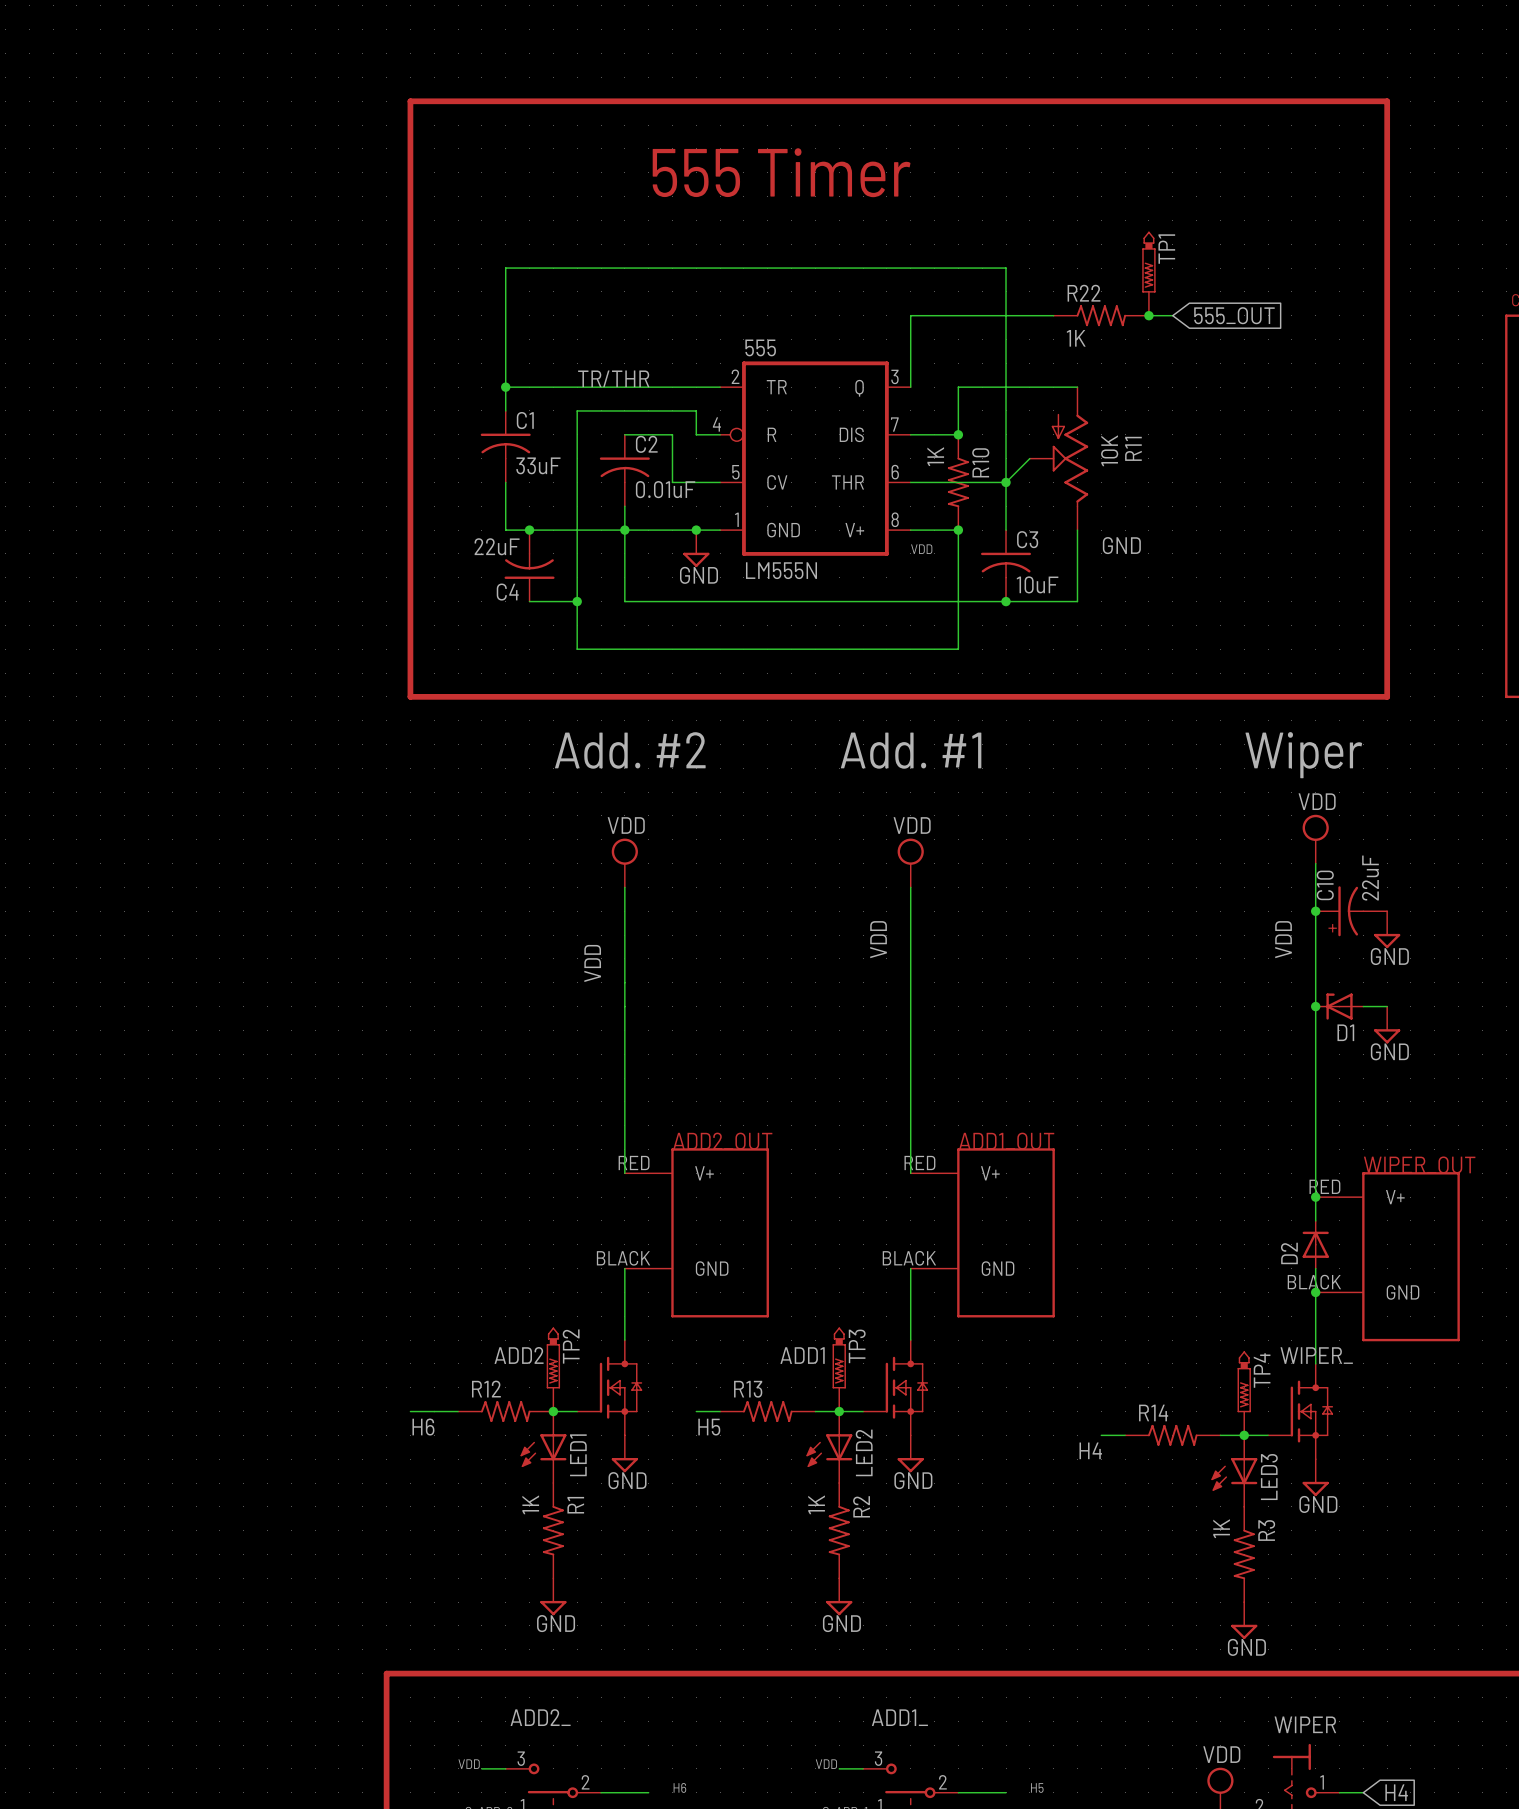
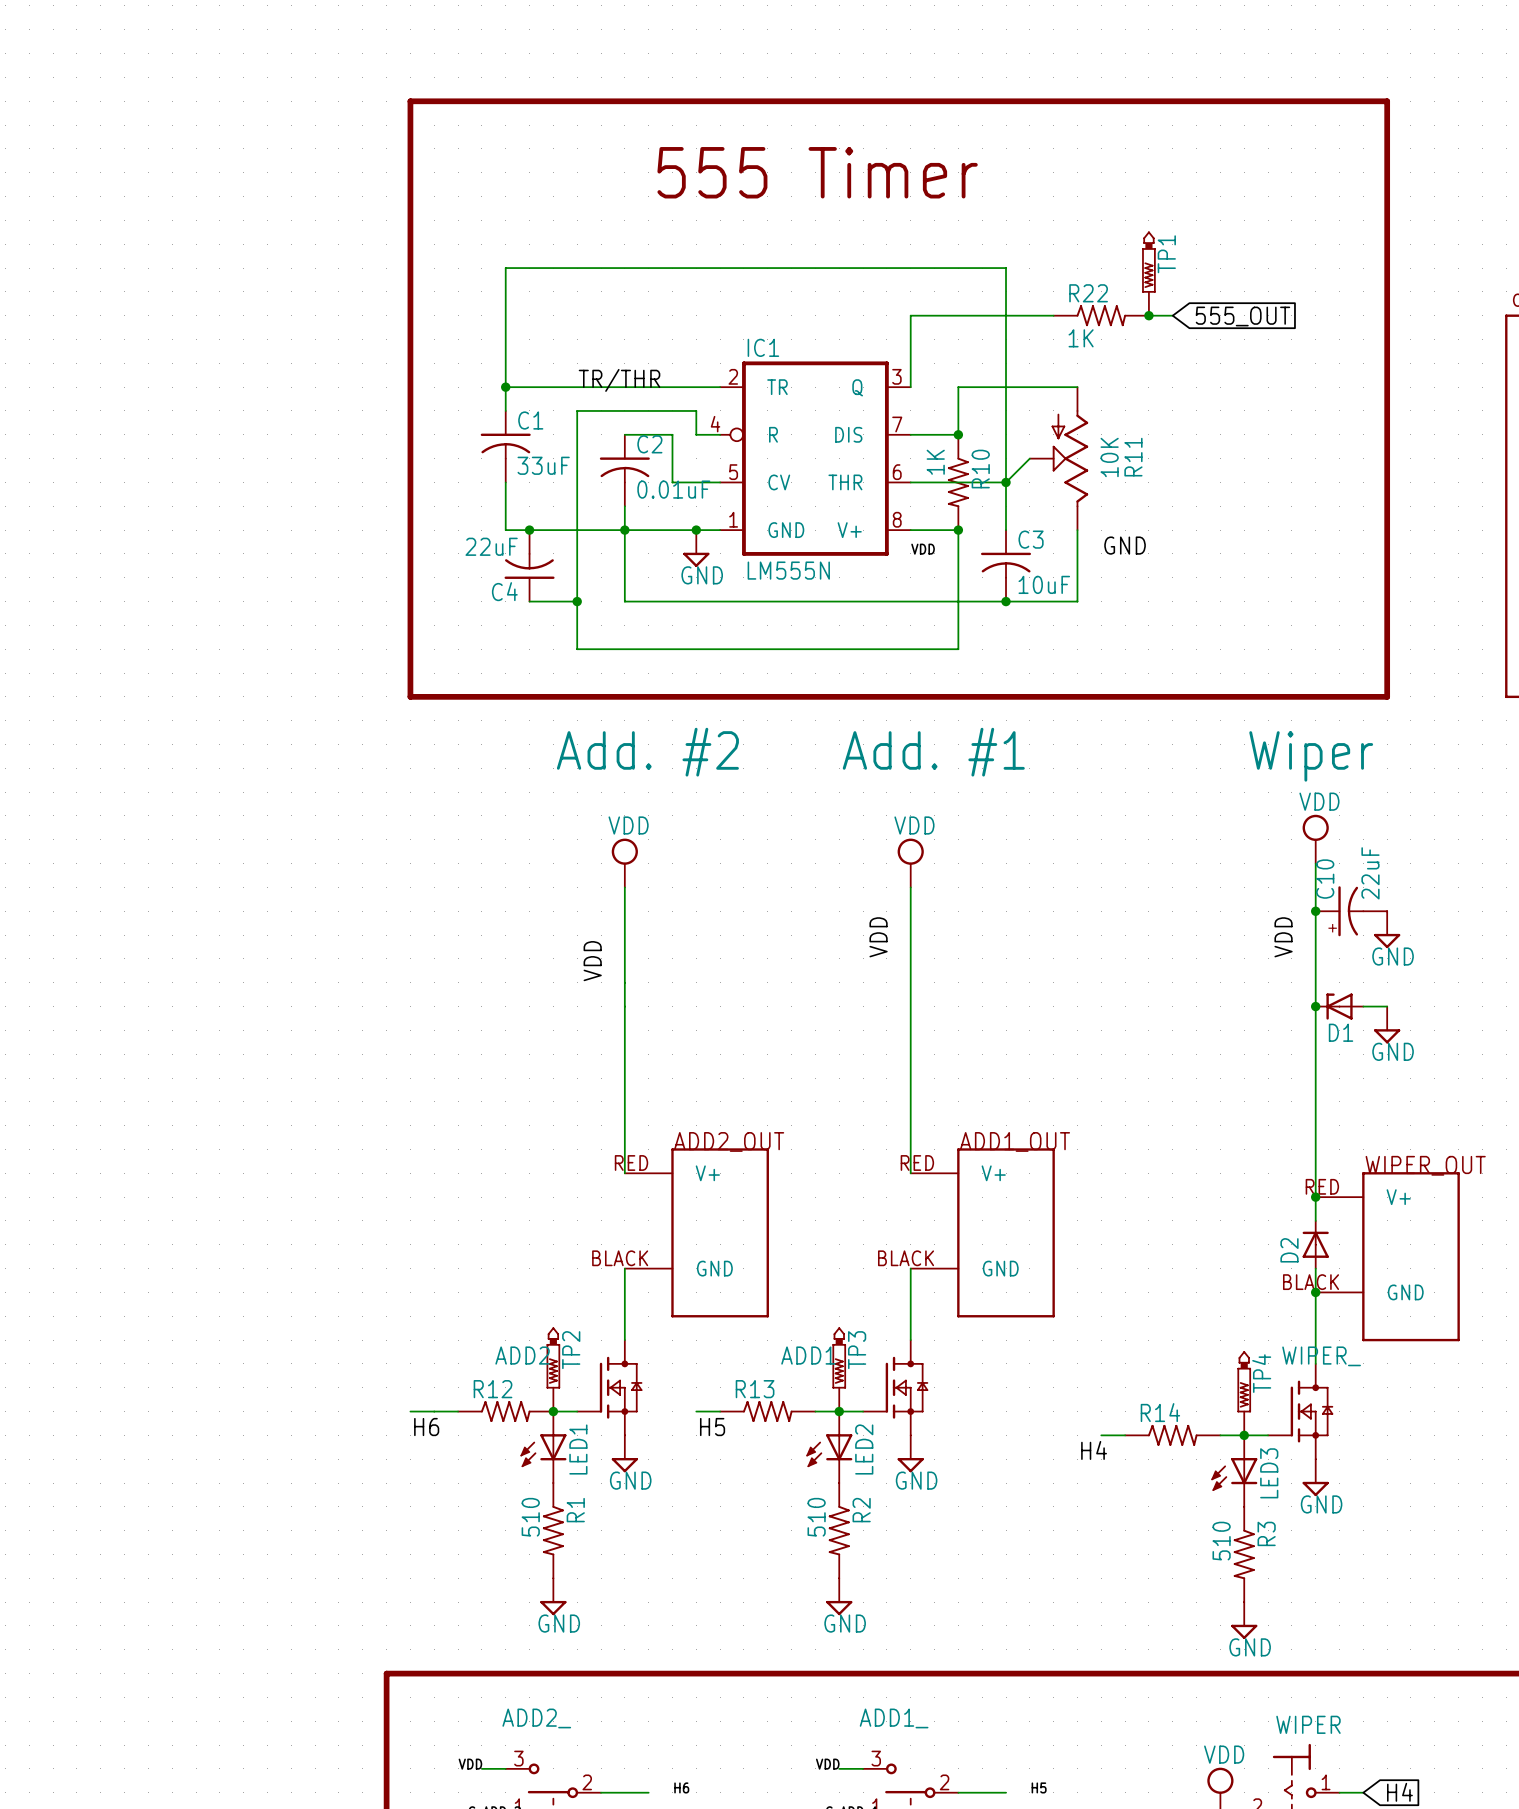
555 name: 555 (760, 347) -> IC1 (763, 347)
R1 value: 1K (530, 1504) -> 510 (530, 1517)
R2 value: 1K (816, 1504) -> 510 (816, 1517)
R3 value: 1K (1221, 1528) -> 510 (1221, 1541)

